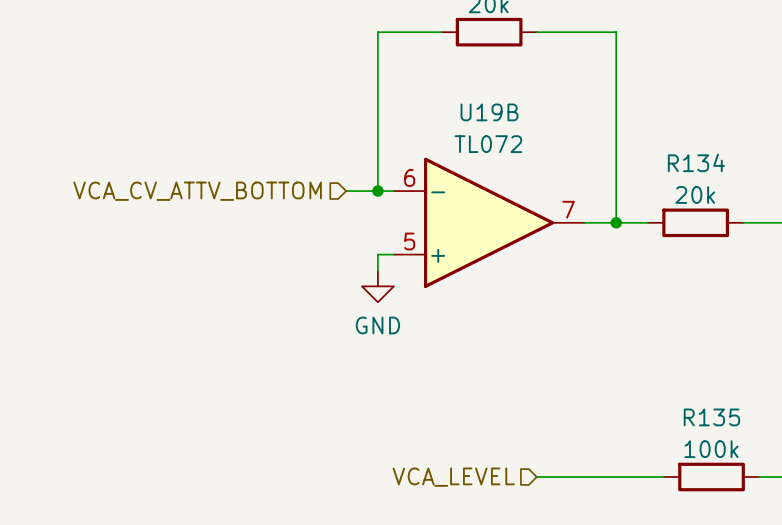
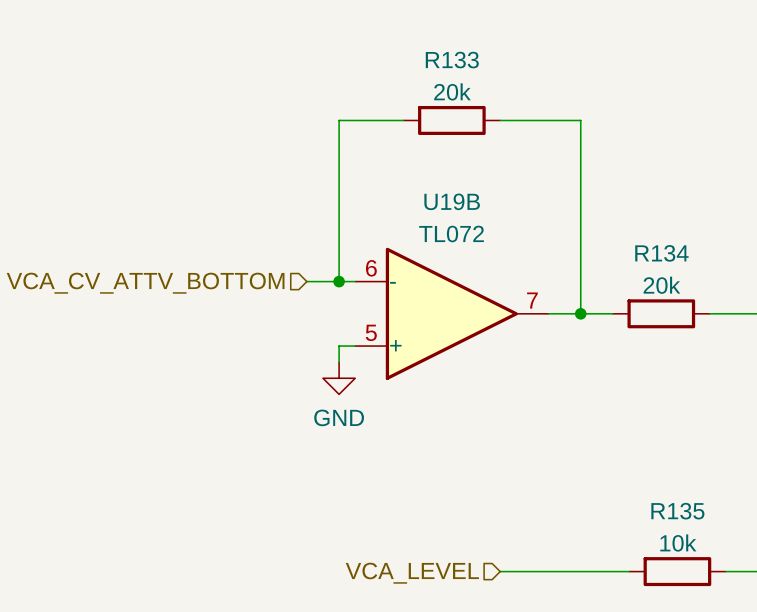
R135 value: 100k (711, 449) -> 10k (678, 543)

